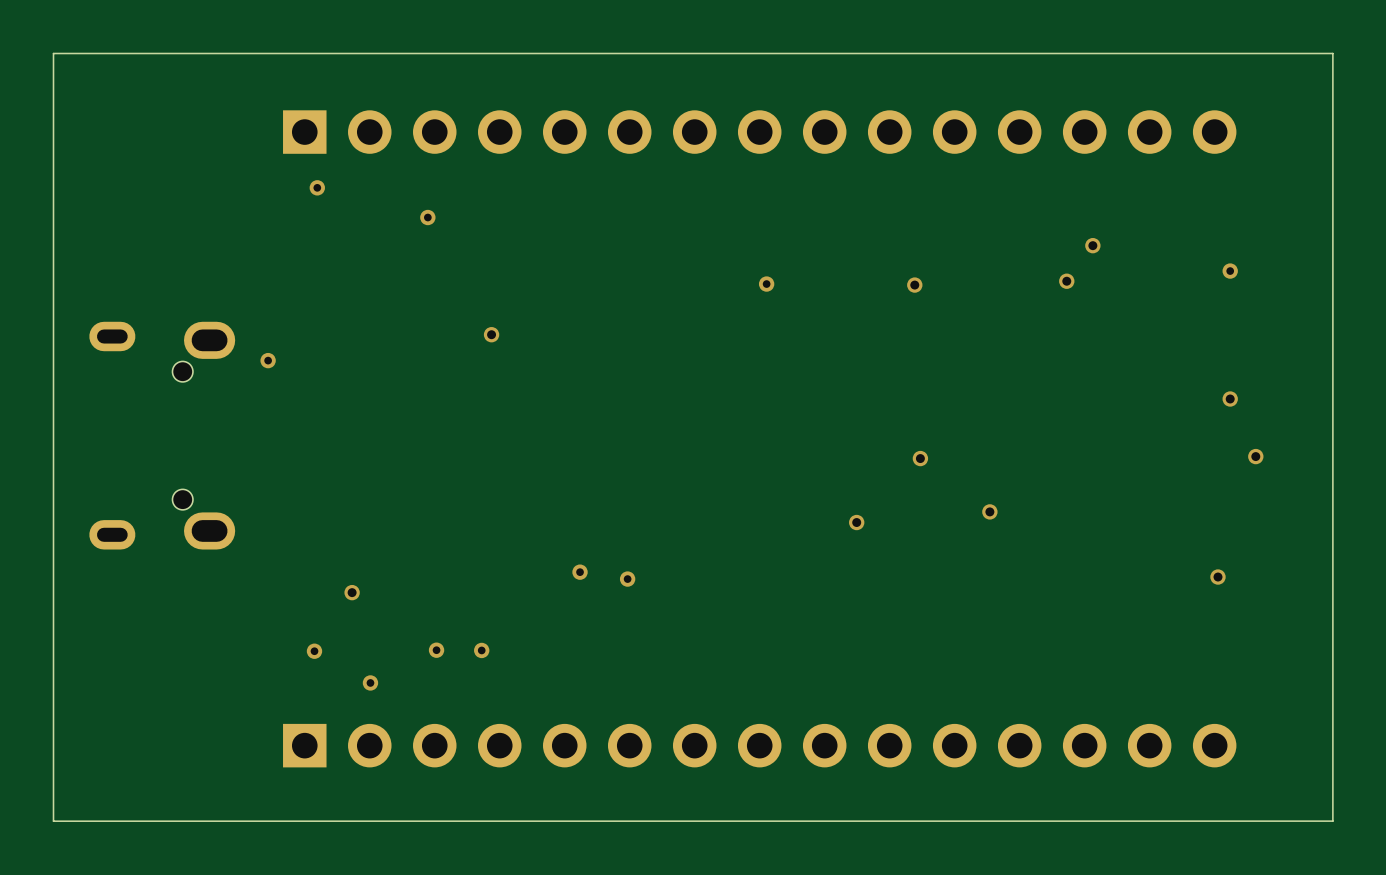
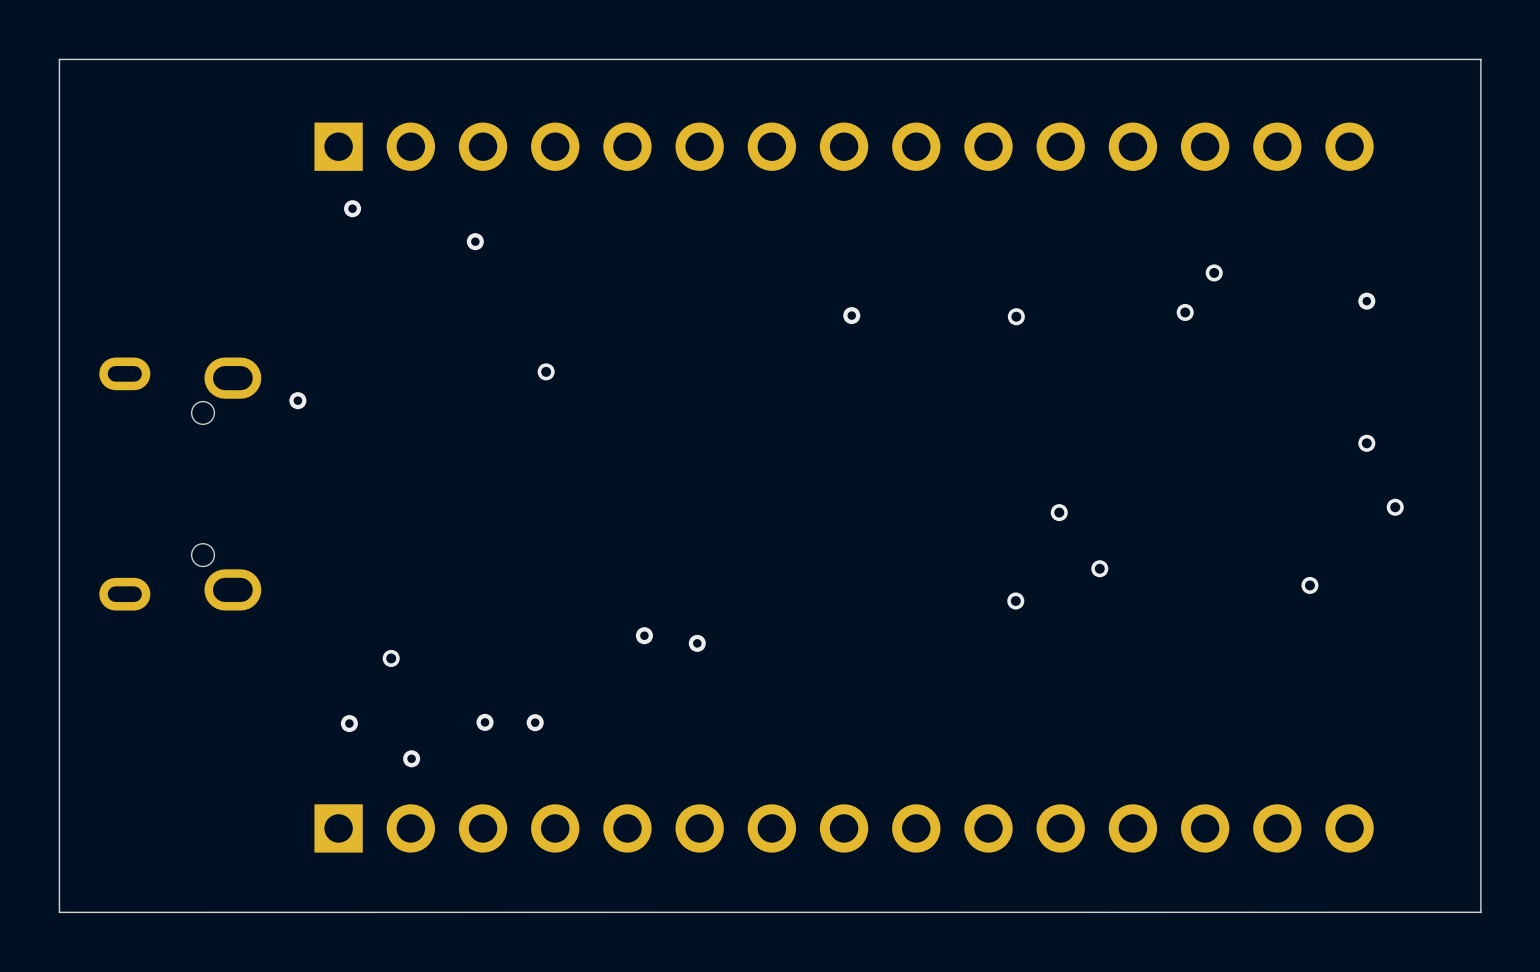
via position: (920, 458) -> (1059, 512)
via: (856, 522) -> none
via: none -> (1015, 601)
via position: (1217, 577) -> (1309, 585)

